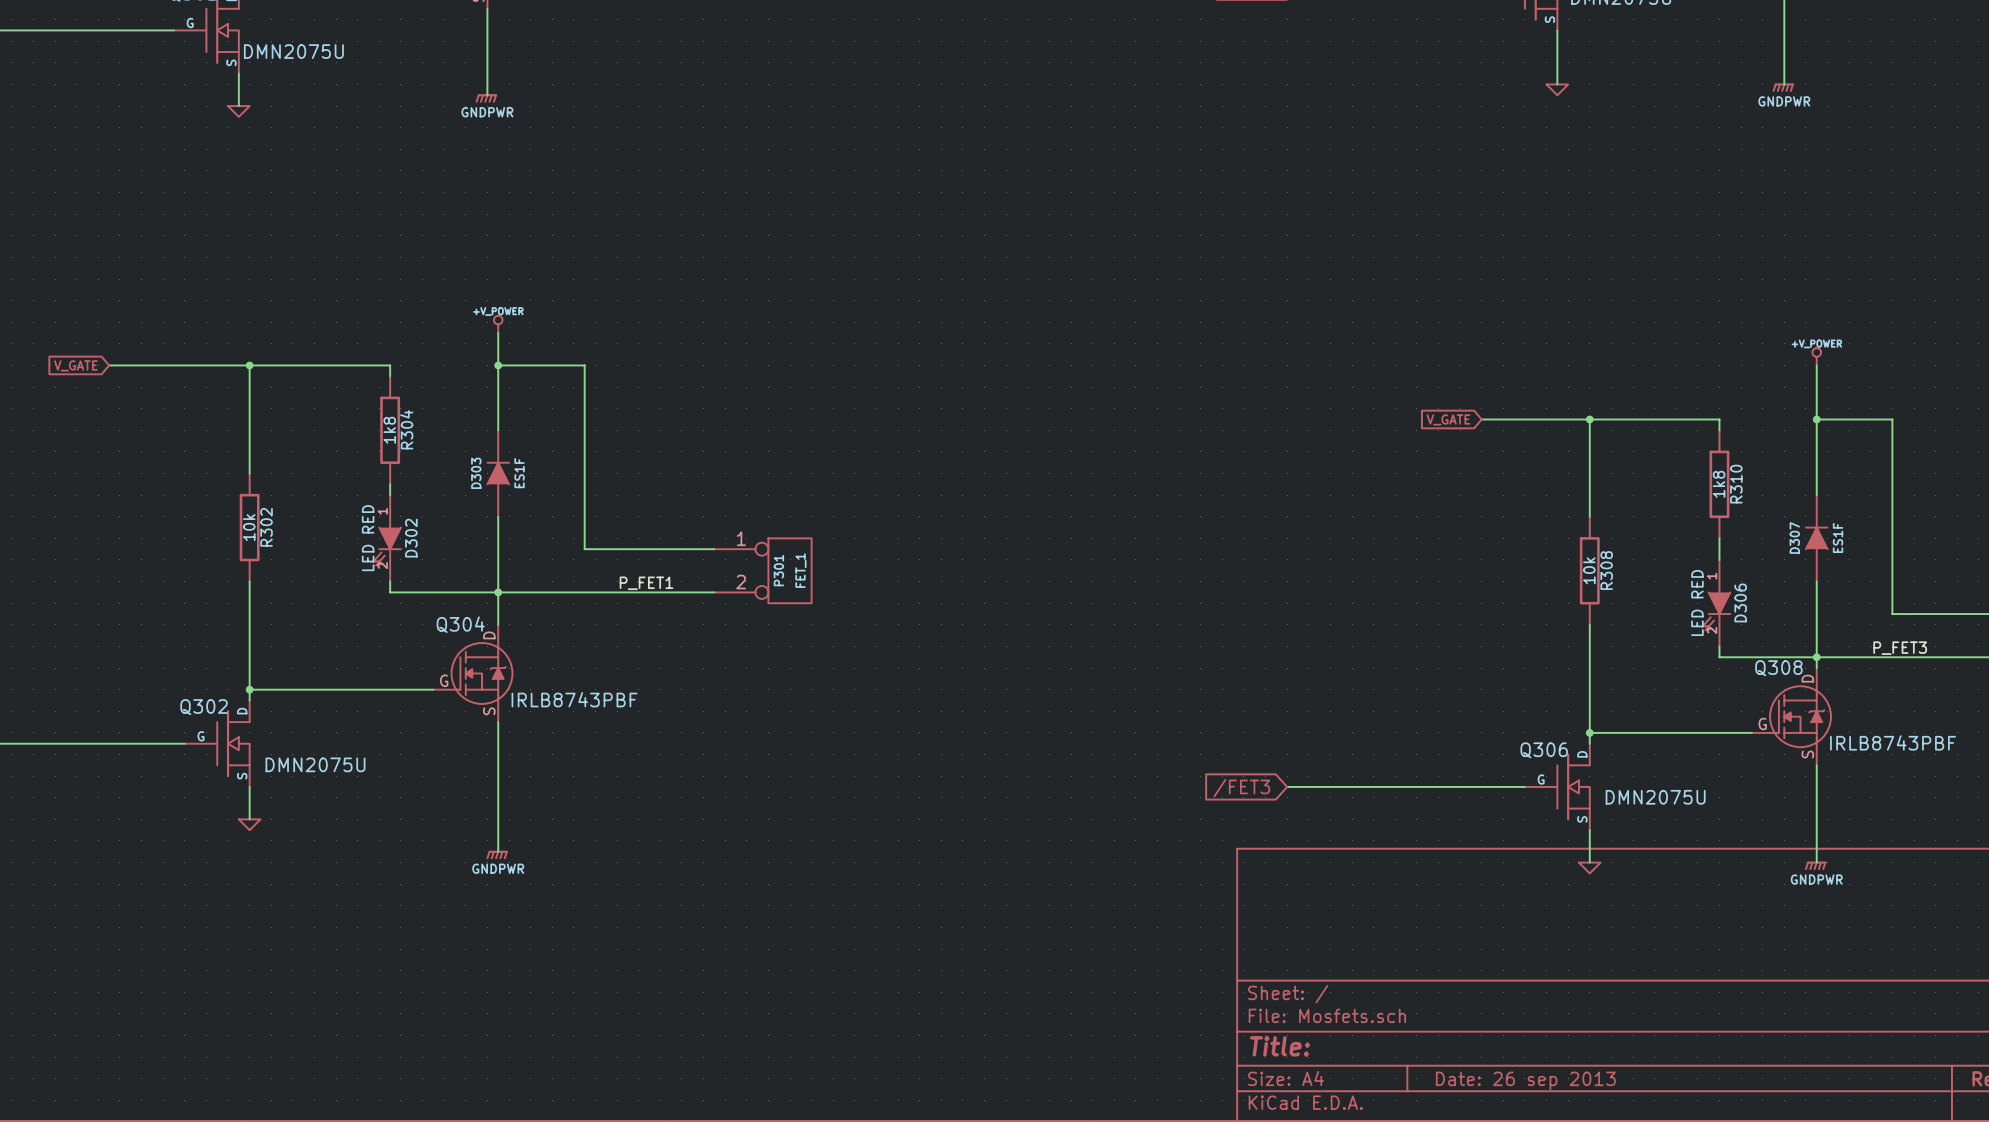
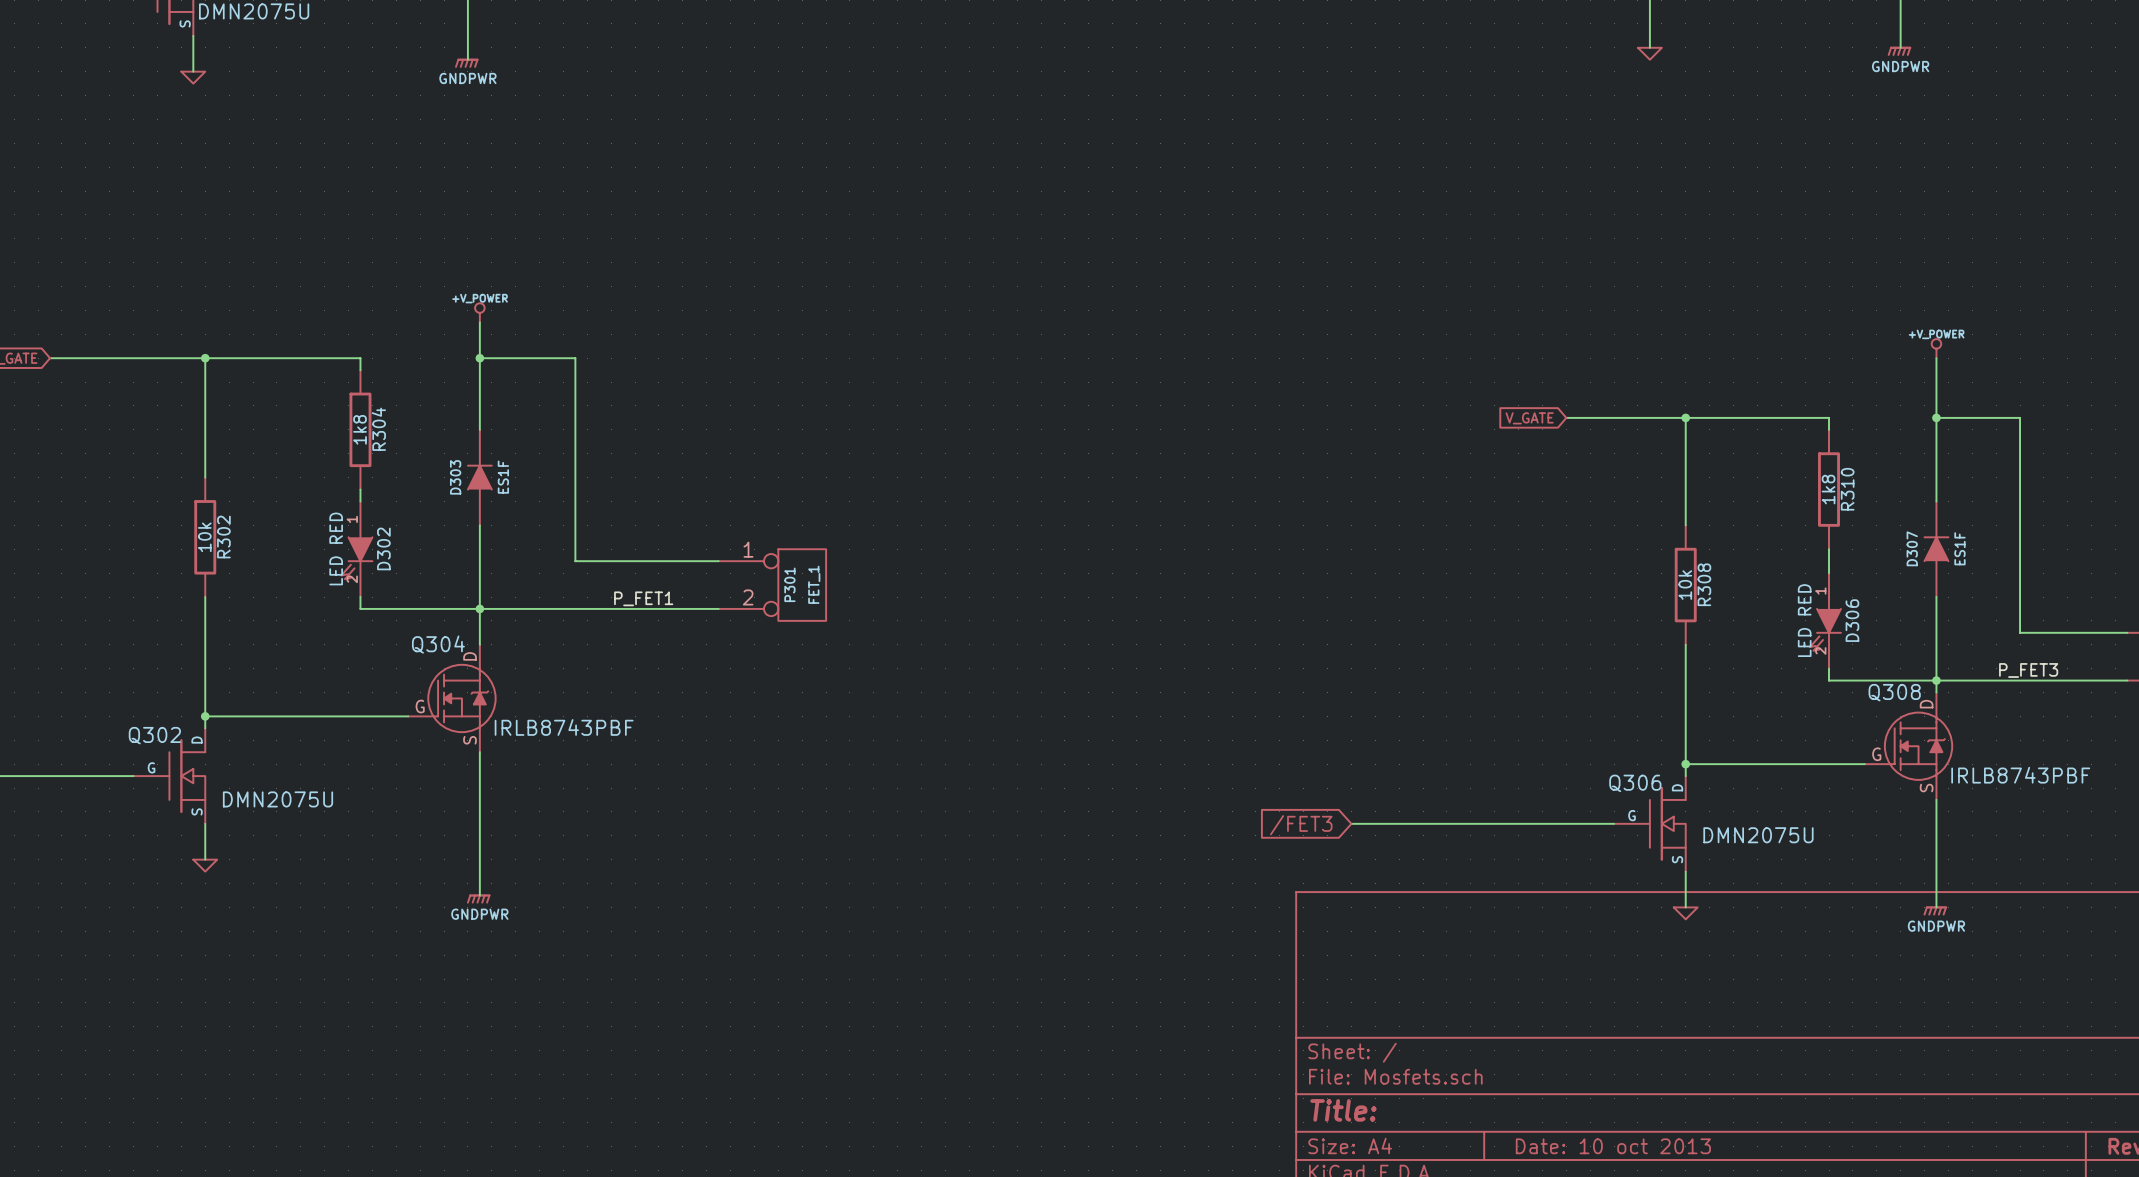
title block: Date: 26 sep 2013 (1525, 1080) -> Date: 10 oct 2013 (1613, 1146)

